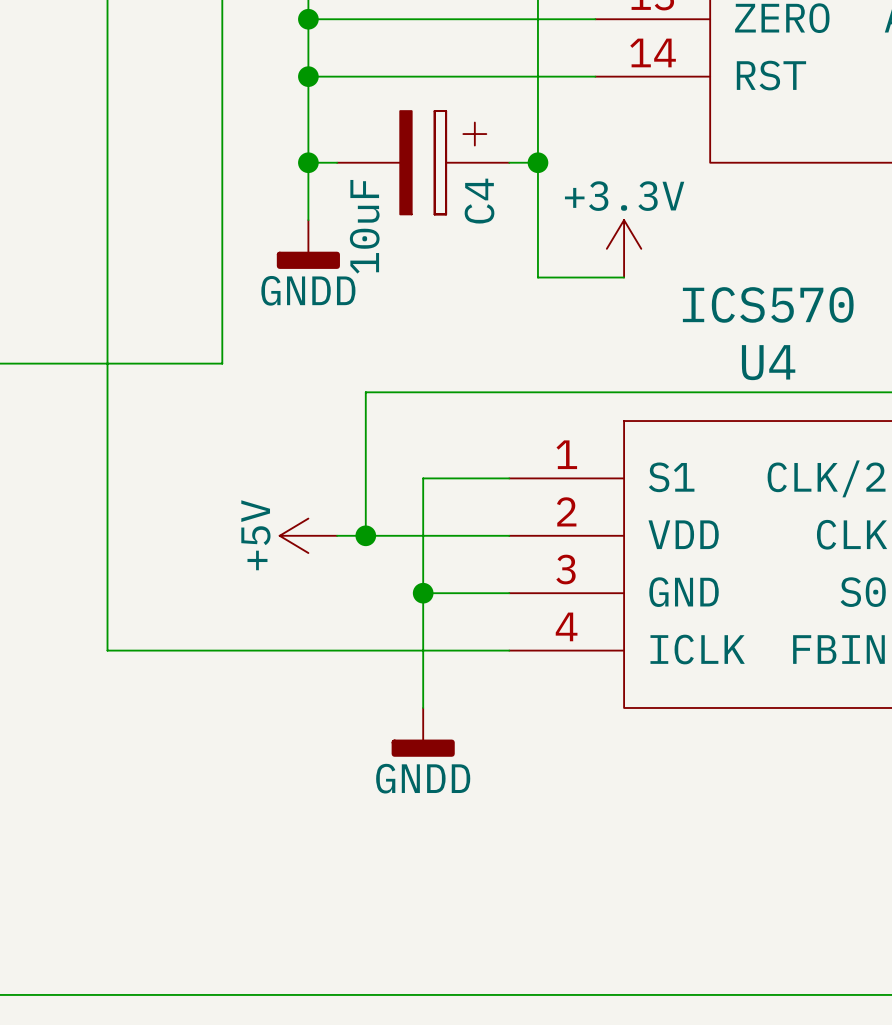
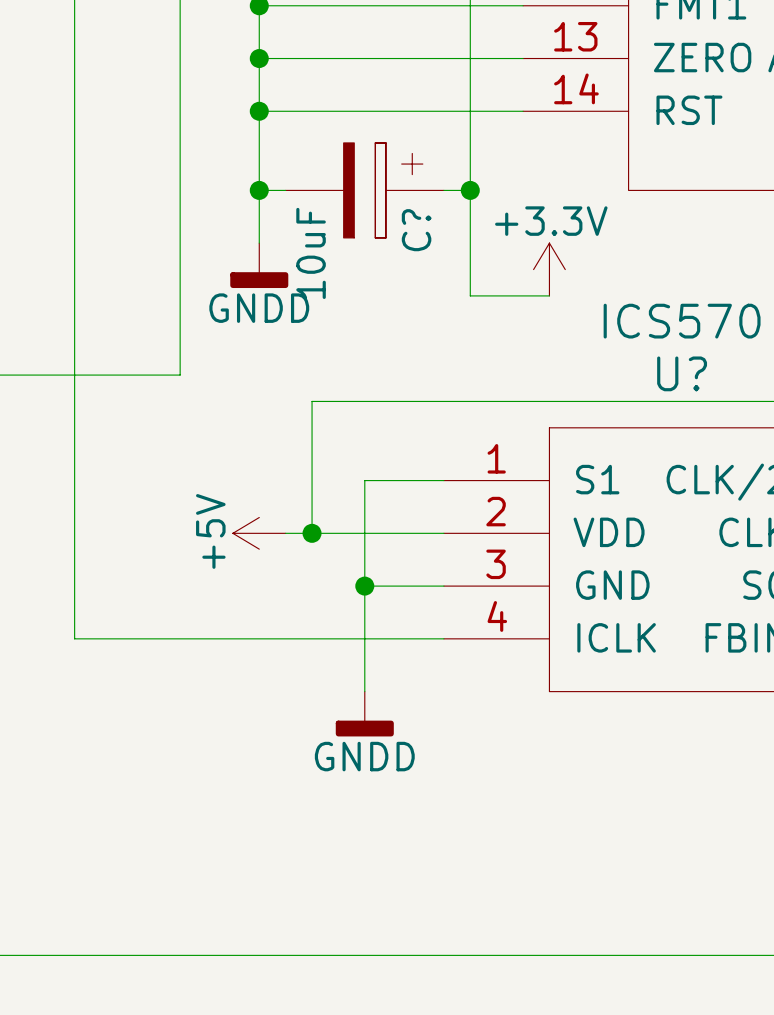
C4 name: C4 (479, 201) -> C? (416, 230)
U4 name: U4 (768, 362) -> U? (682, 373)

